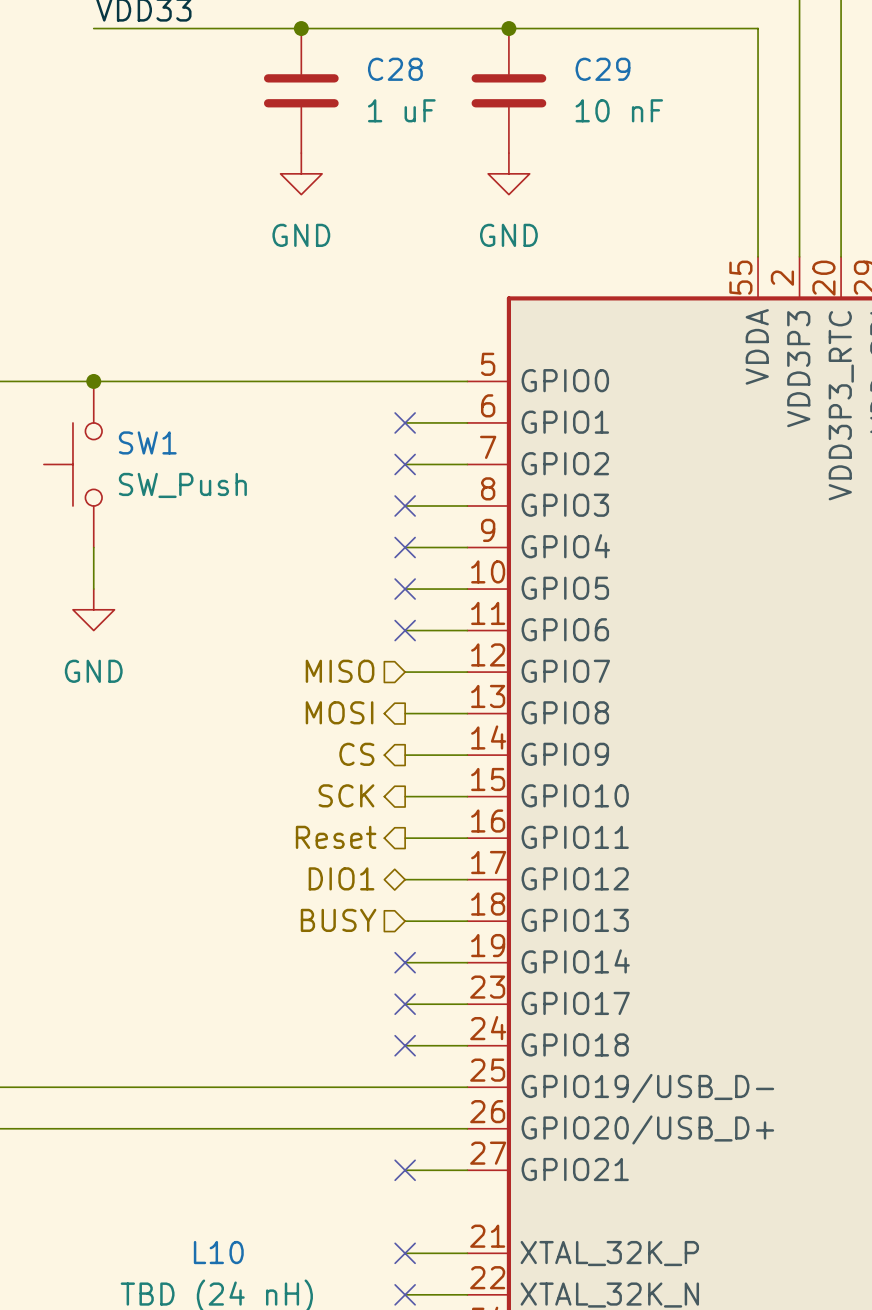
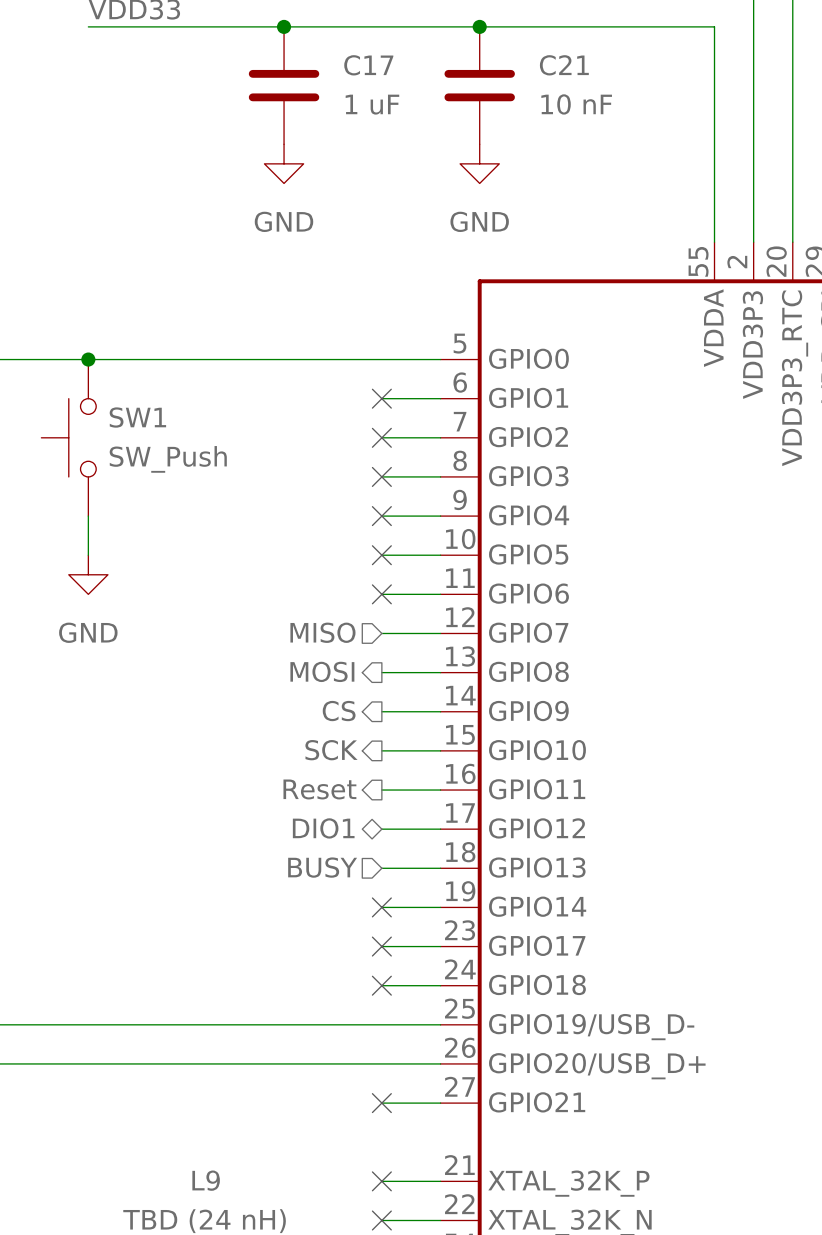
C28 name: C28 (395, 69) -> C17 (368, 65)
C29 name: C29 (602, 69) -> C21 (564, 65)
L10 name: L10 (218, 1252) -> L9 (206, 1180)

